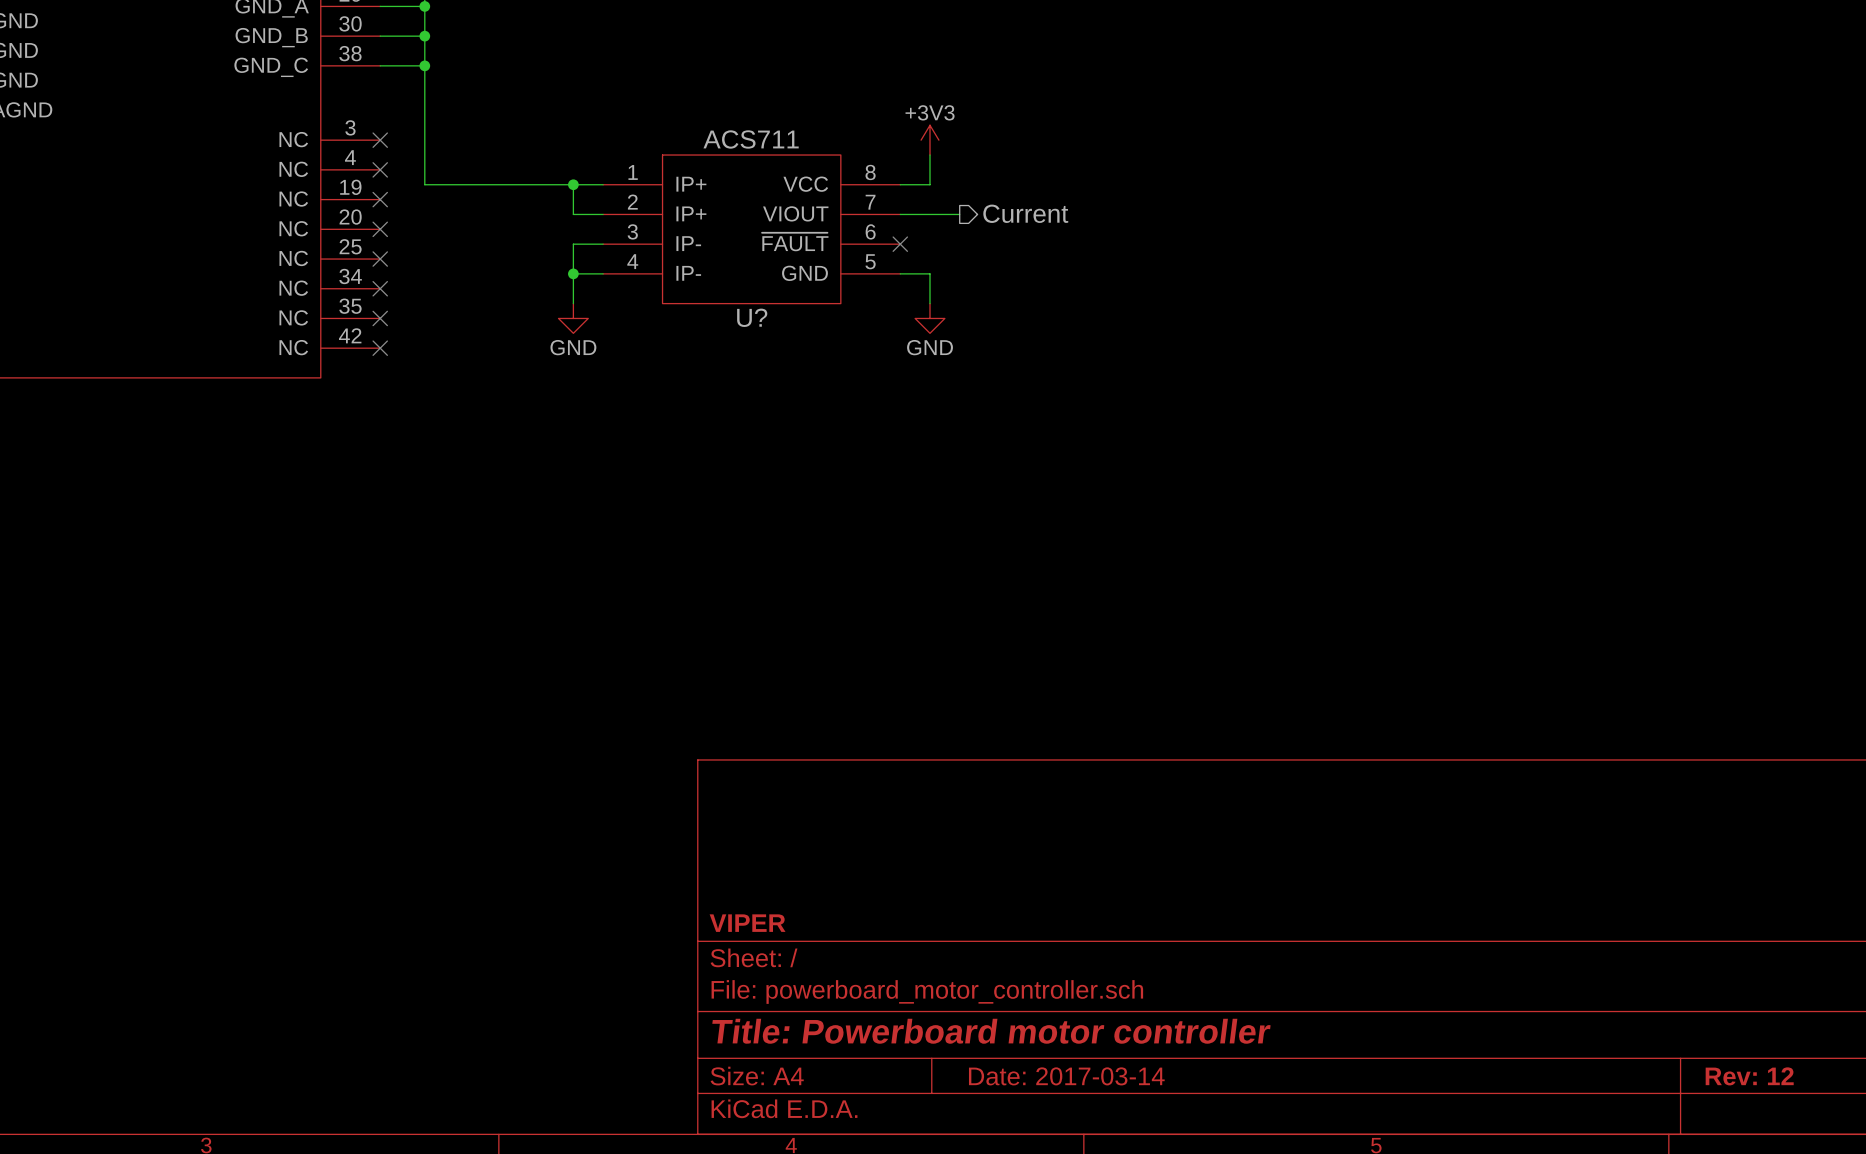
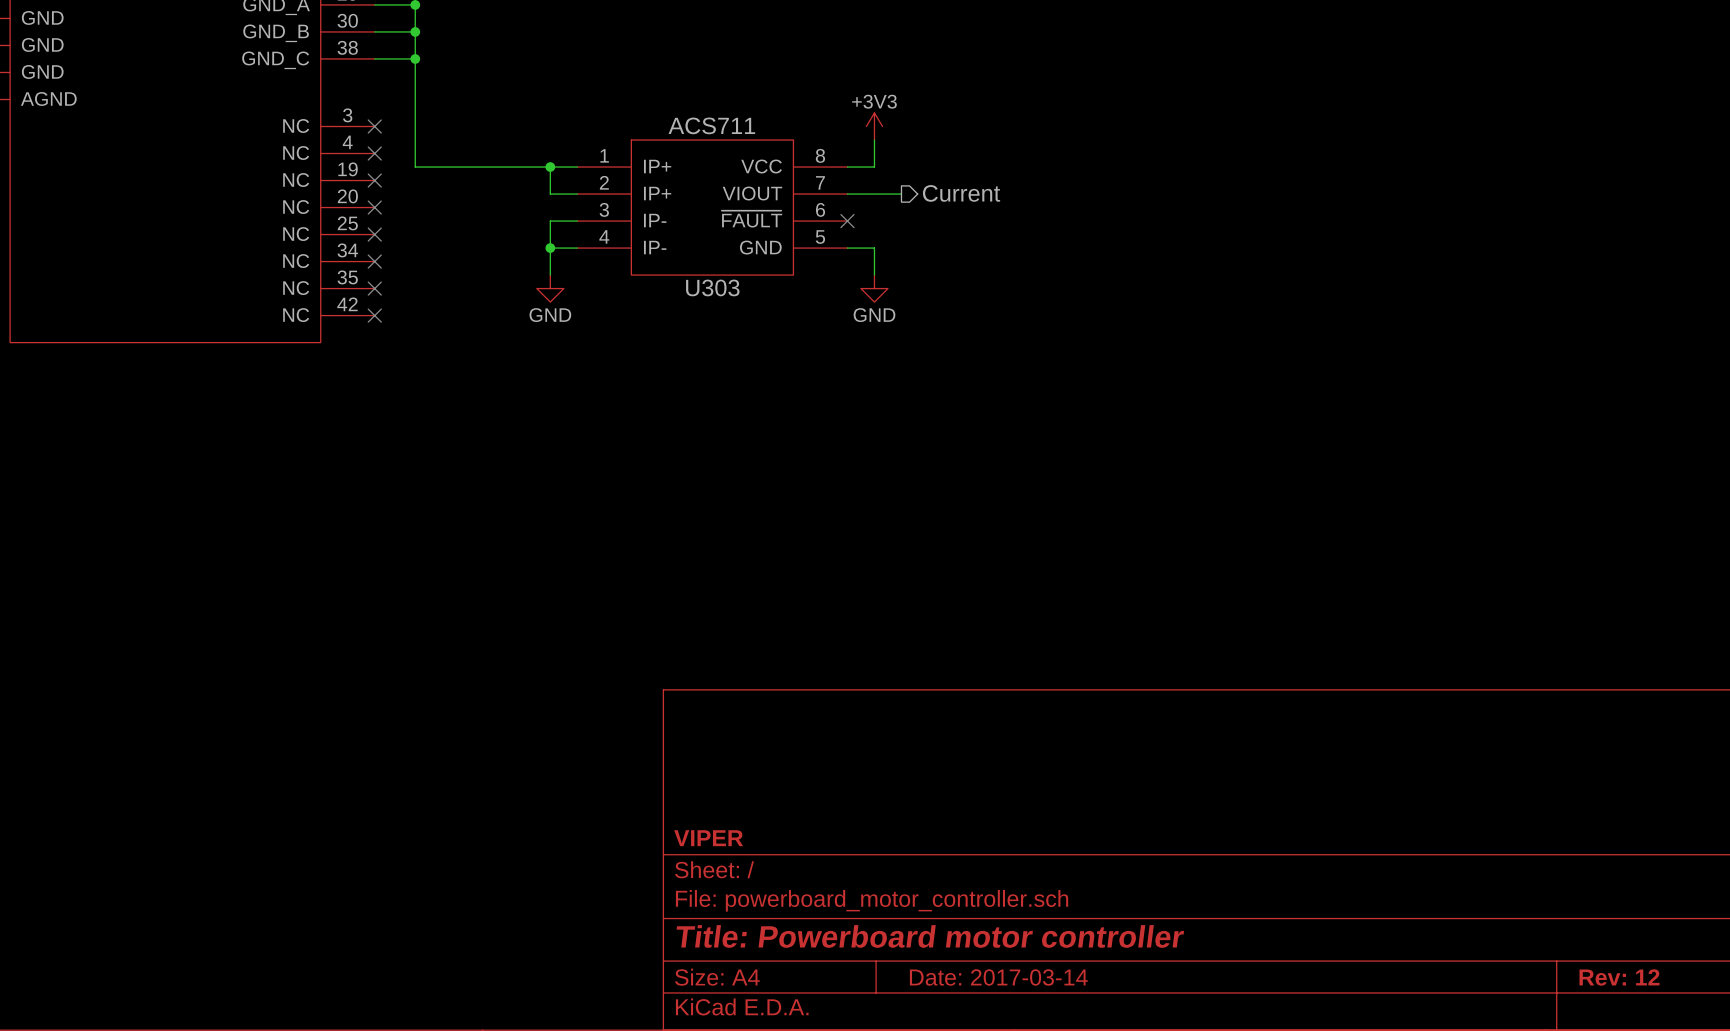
U? name: U? (752, 317) -> U303 (712, 287)

